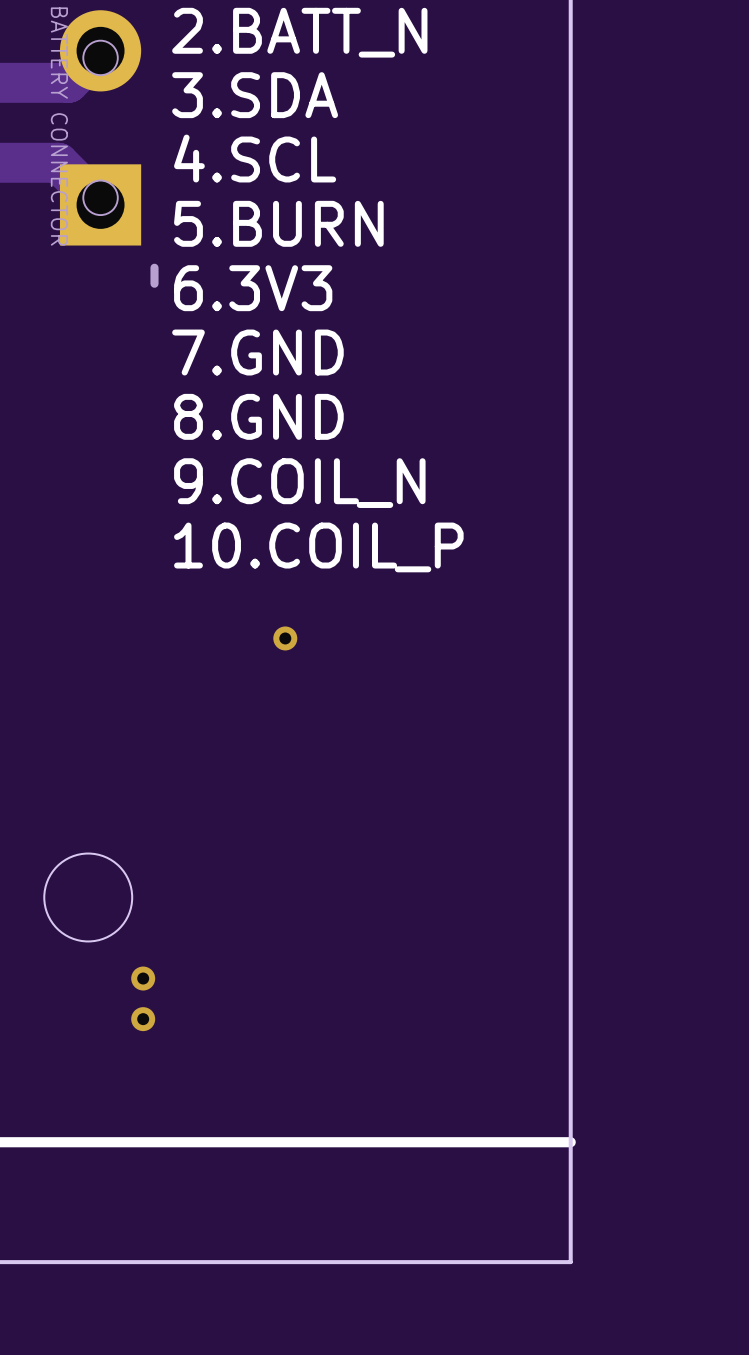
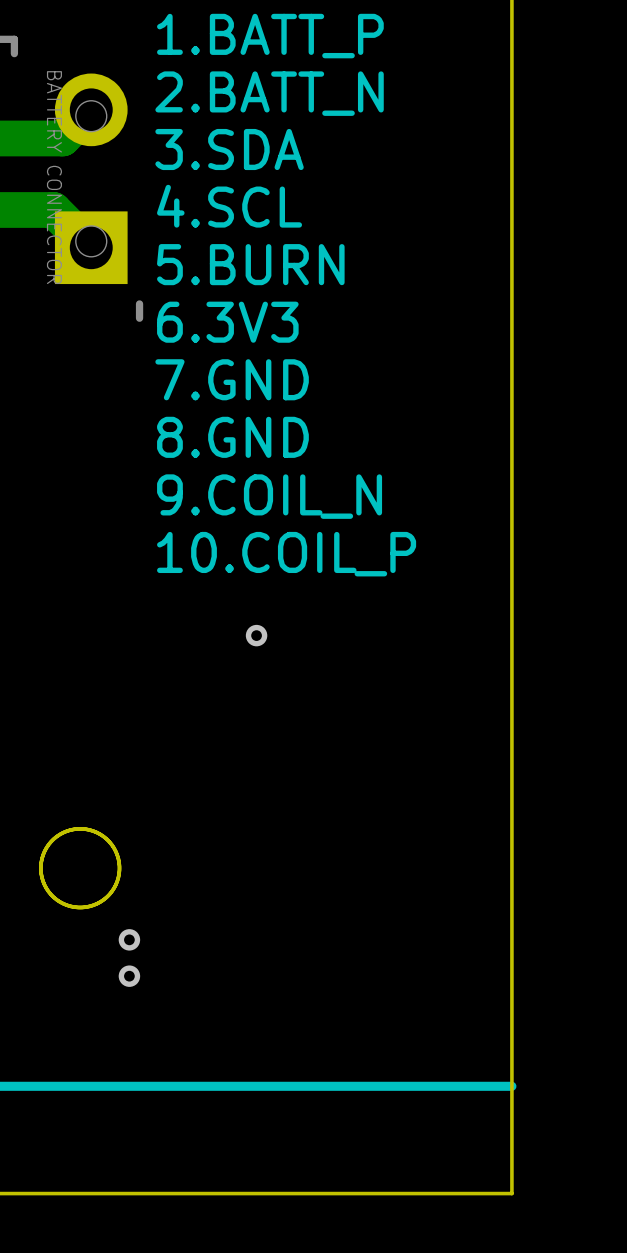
round board edge: none -> [39, 827, 122, 910]

